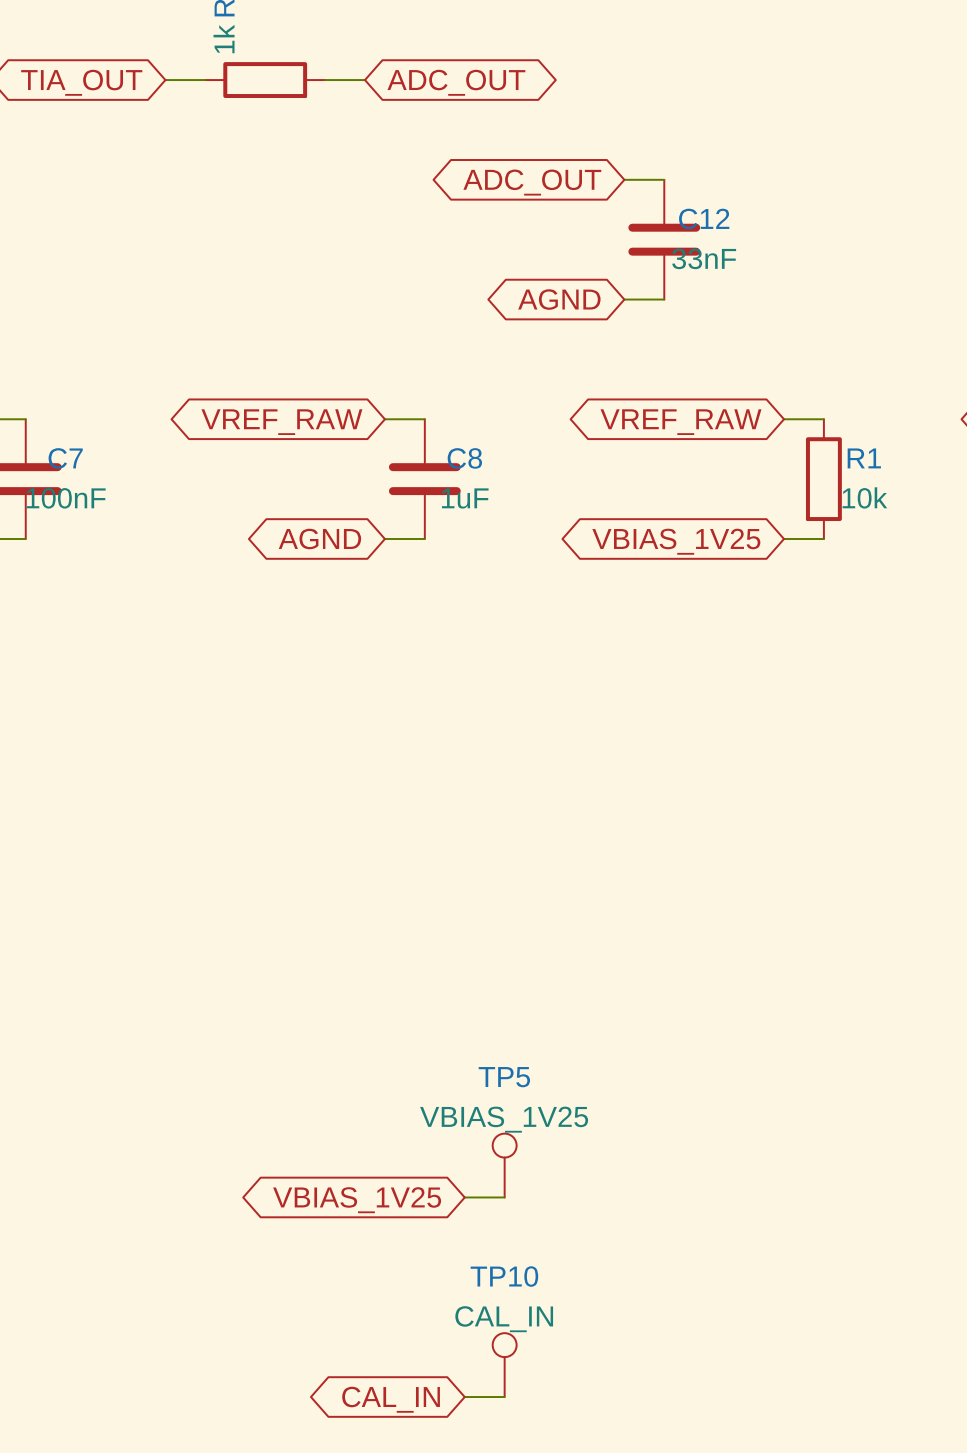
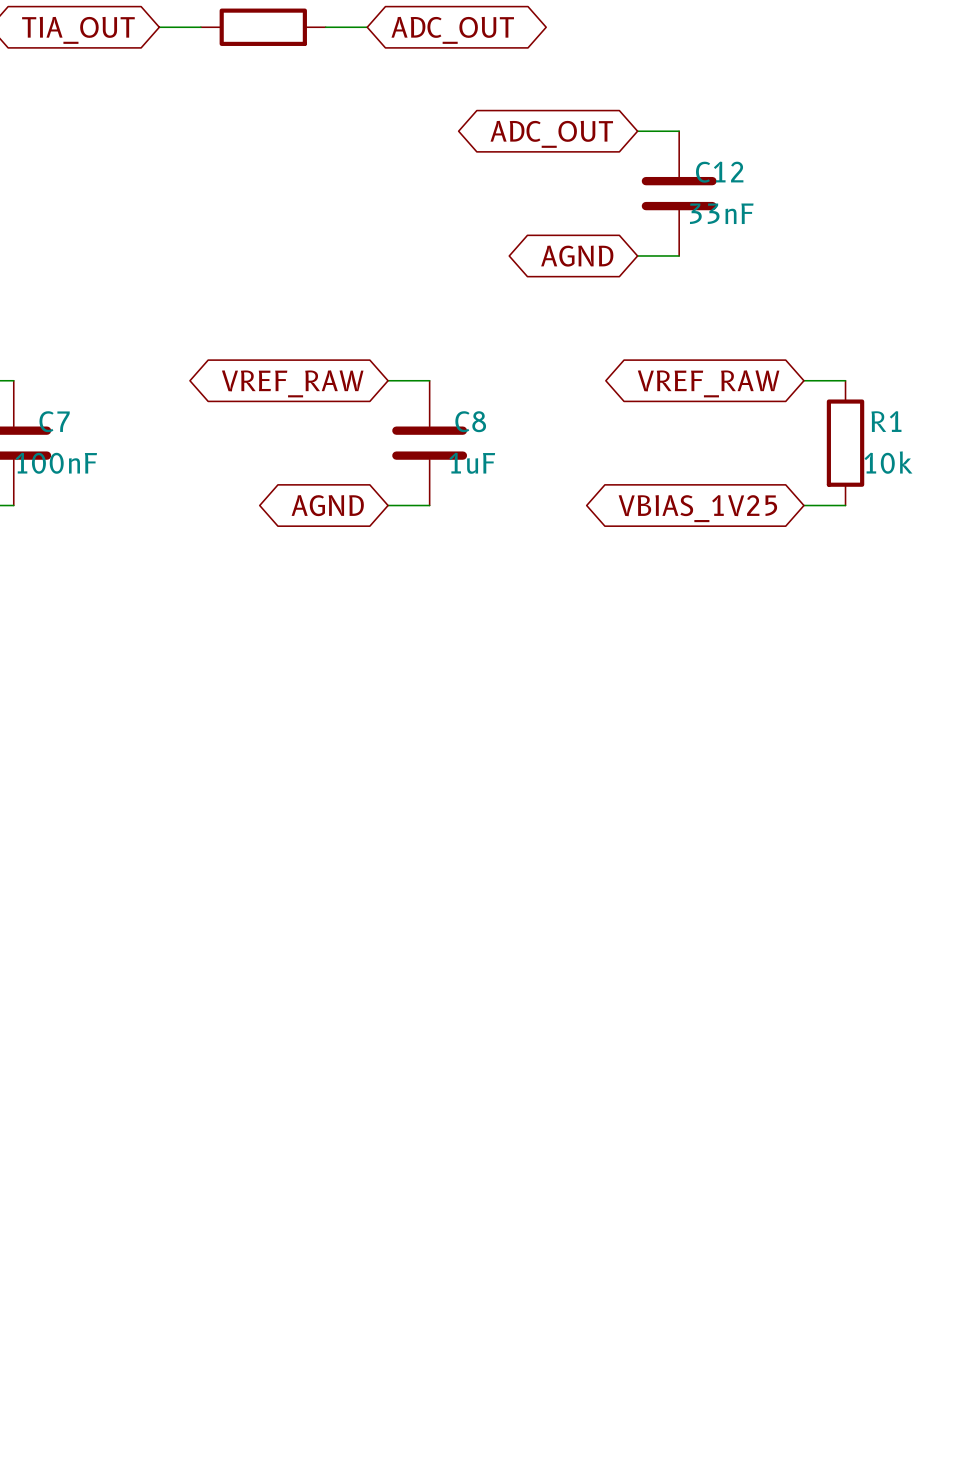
TP5: VBIAS_1V25 (504, 1165) -> none
wire: (464, 1197) (504, 1197) -> none
global label: VBIAS_1V25 (357, 1200) -> none
TP10: CAL_IN (504, 1365) -> none
wire: (464, 1397) (504, 1397) -> none
global label: CAL_IN (391, 1399) -> none

